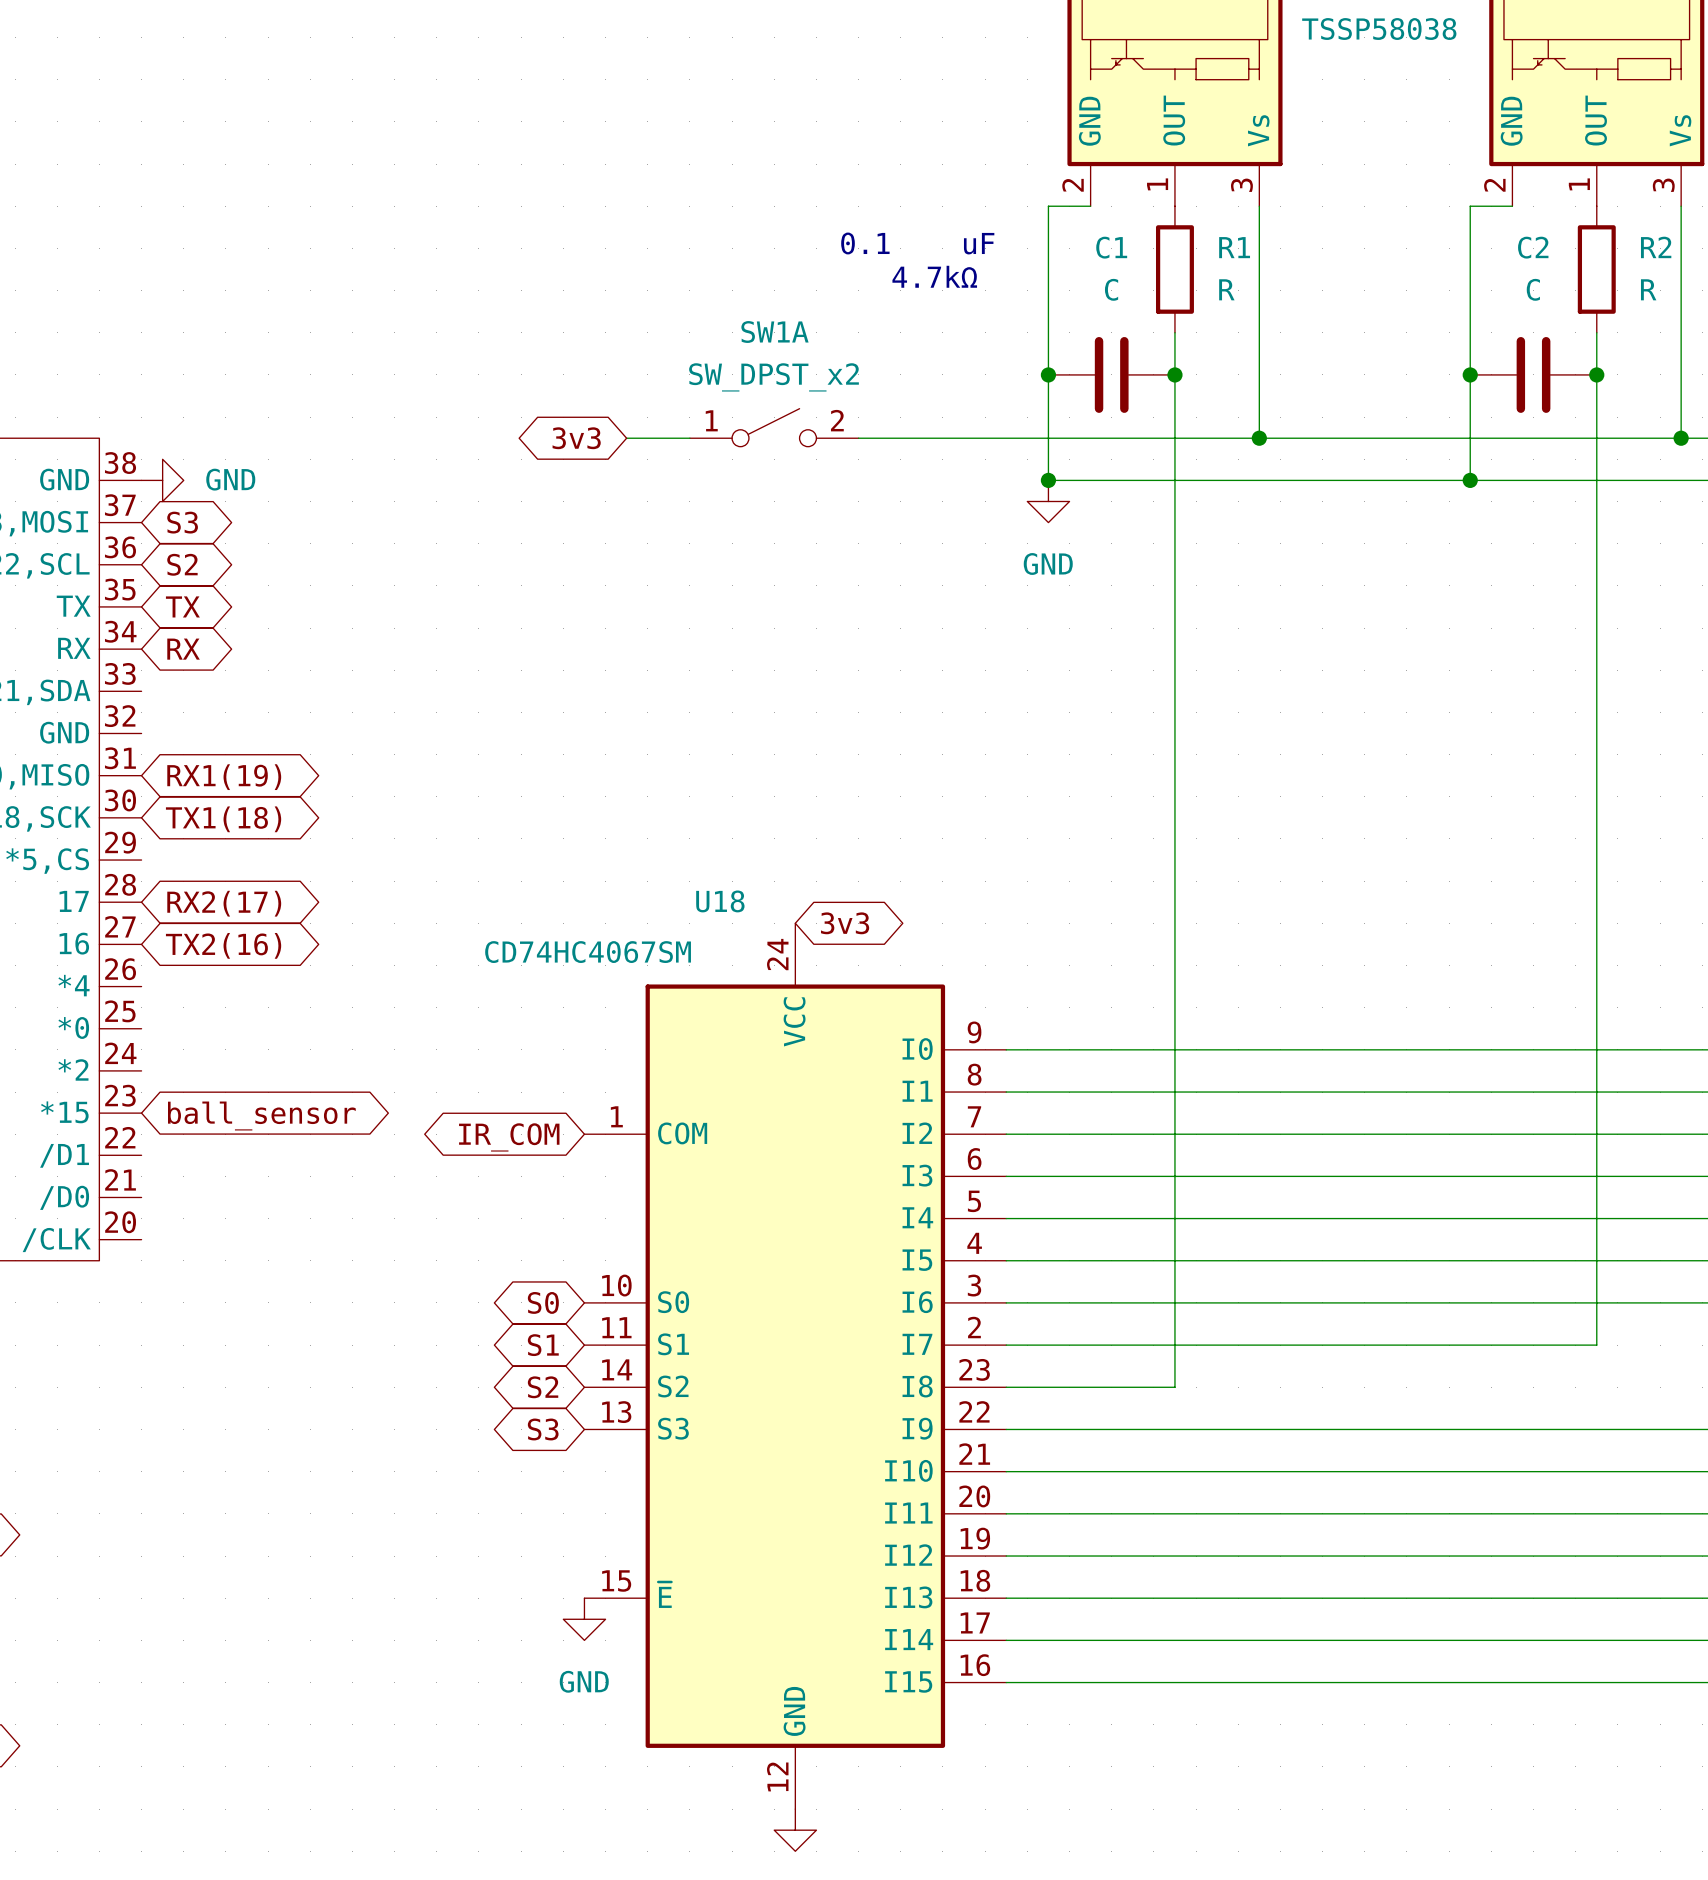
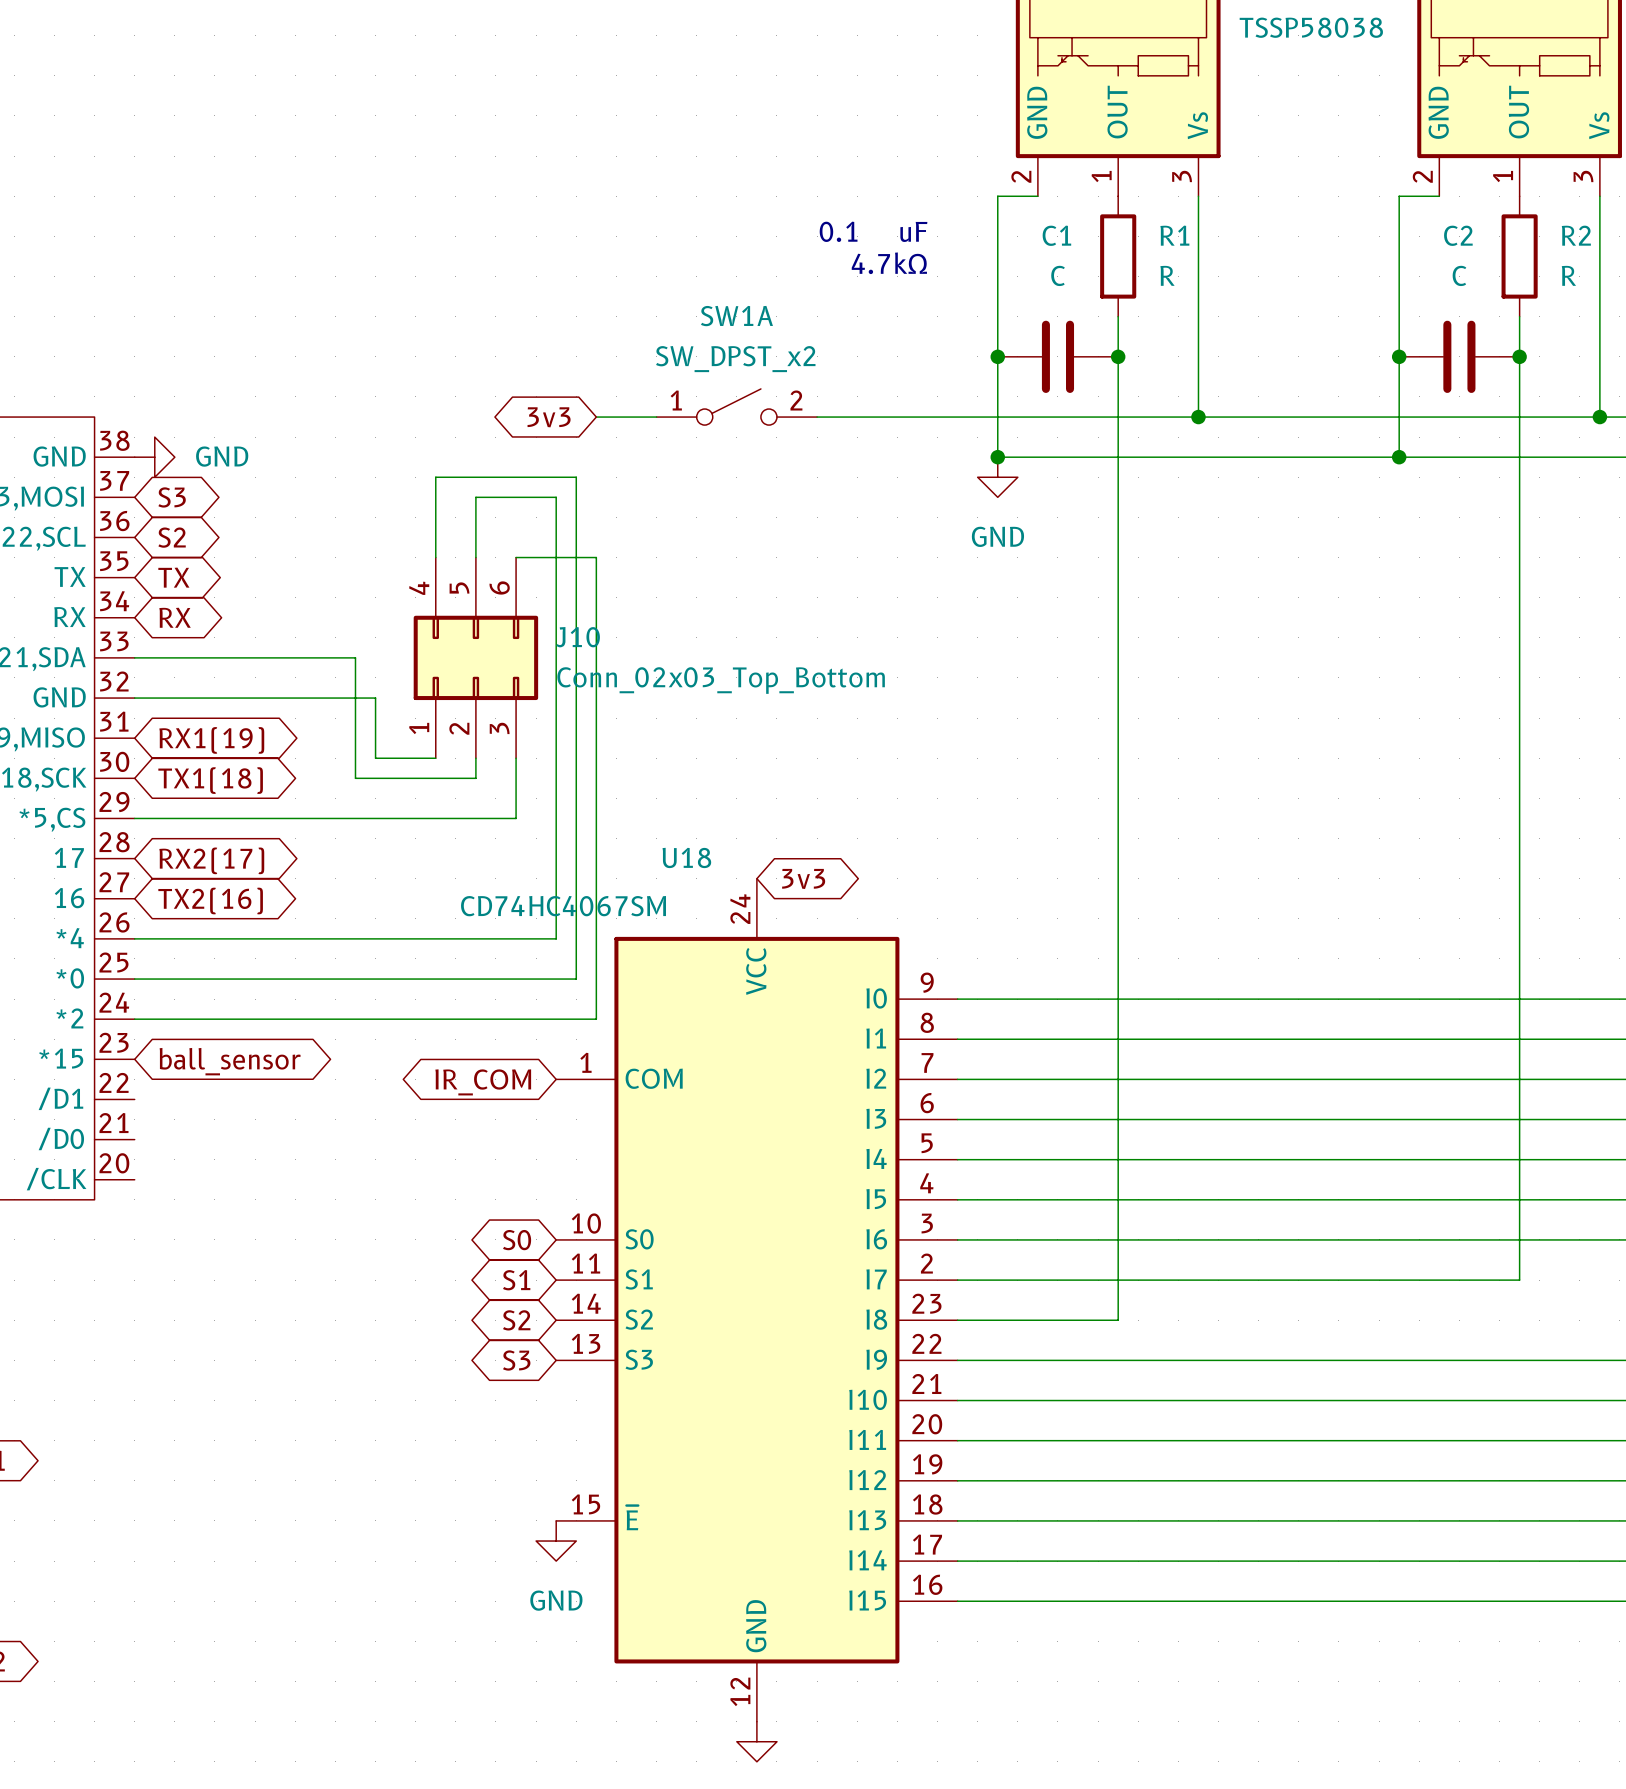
wire: none -> (435, 557) (435, 477) (576, 477) (576, 979) (134, 979)
wire: none -> (475, 557) (475, 497) (556, 497) (556, 938) (134, 938)
wire: none -> (516, 557) (596, 557) (596, 1019) (134, 1019)
wire: none -> (134, 657) (355, 657) (355, 778) (475, 778) (475, 758)
J10: none -> Conn_02x03_Top_Bottom (475, 657)
wire: none -> (134, 698) (375, 698) (375, 758) (435, 758)
wire: none -> (516, 758) (516, 818) (134, 818)

